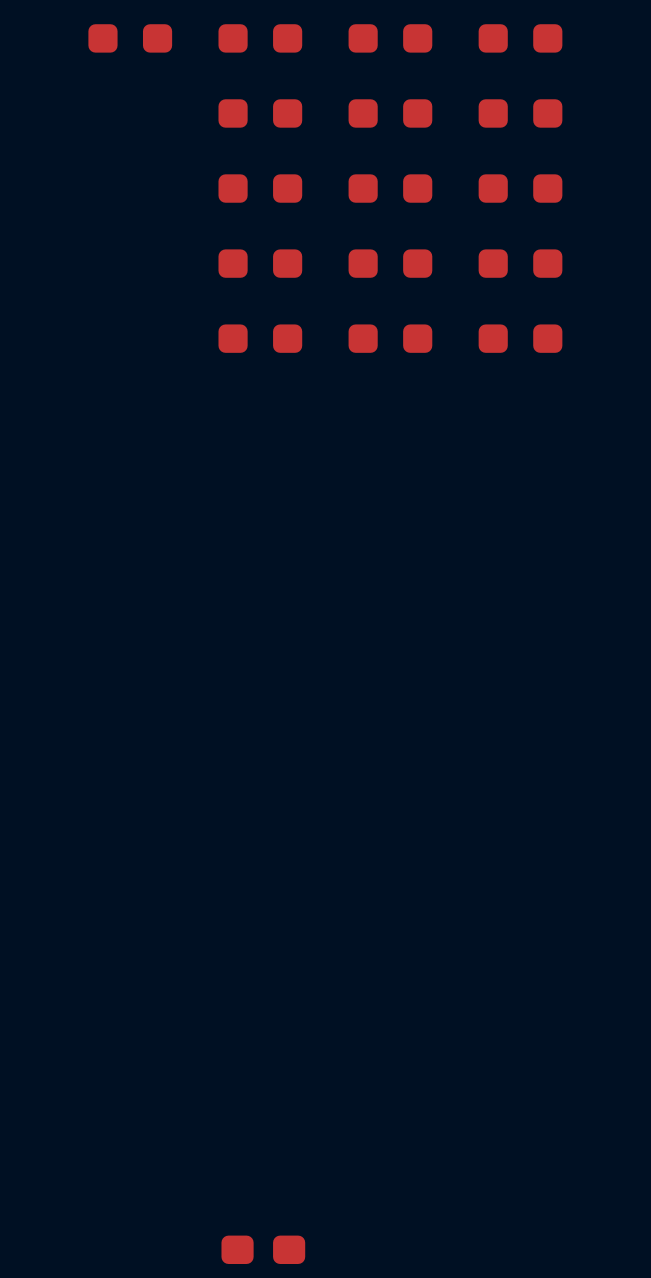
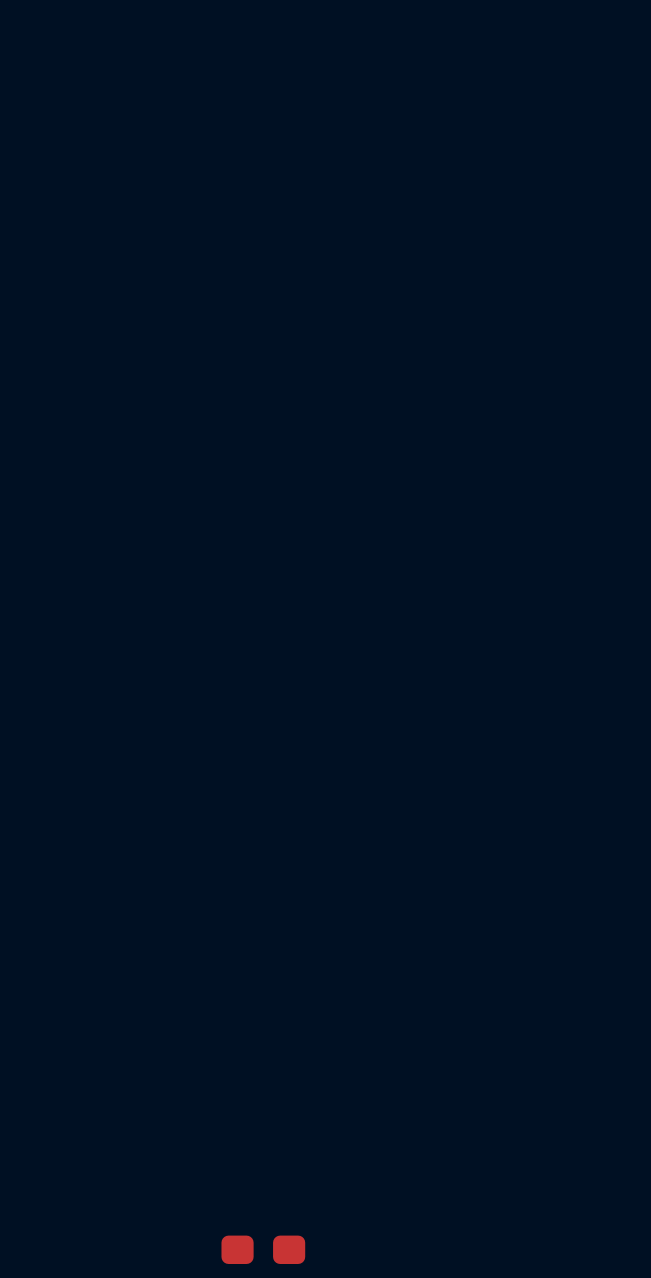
part: (130, 38) -> none
part: (260, 38) -> none
part: (390, 38) -> none
part: (520, 38) -> none
part: (260, 113) -> none
part: (390, 113) -> none
part: (520, 113) -> none
part: (260, 188) -> none
part: (390, 188) -> none
part: (520, 188) -> none
part: (260, 263) -> none
part: (390, 263) -> none
part: (520, 263) -> none
part: (260, 338) -> none
part: (390, 338) -> none
part: (520, 338) -> none

